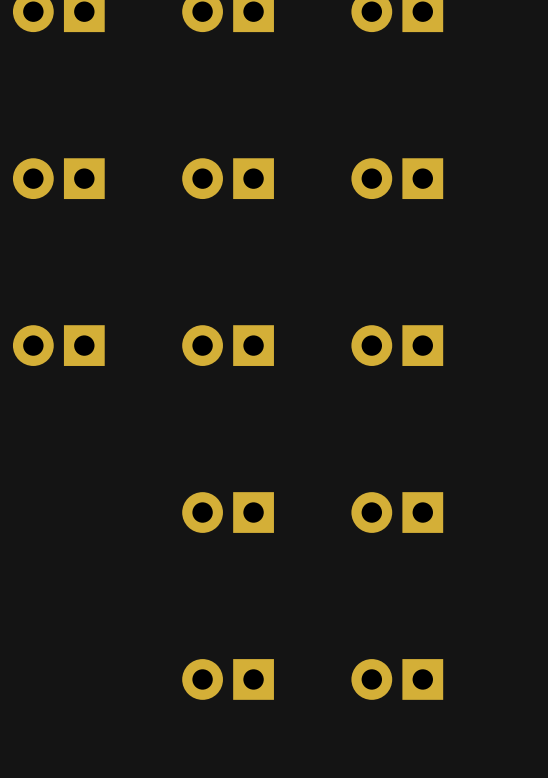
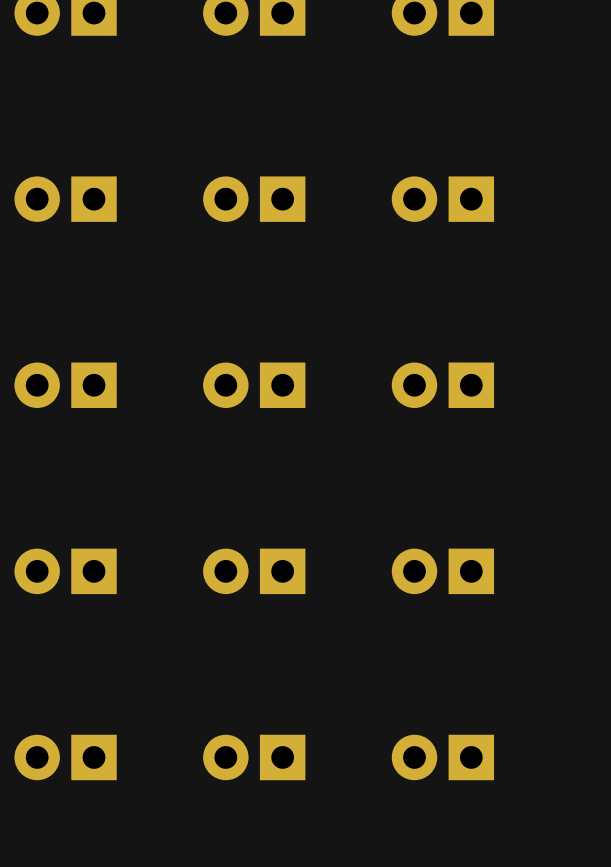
part: none -> (65, 571)
part: none -> (65, 757)

